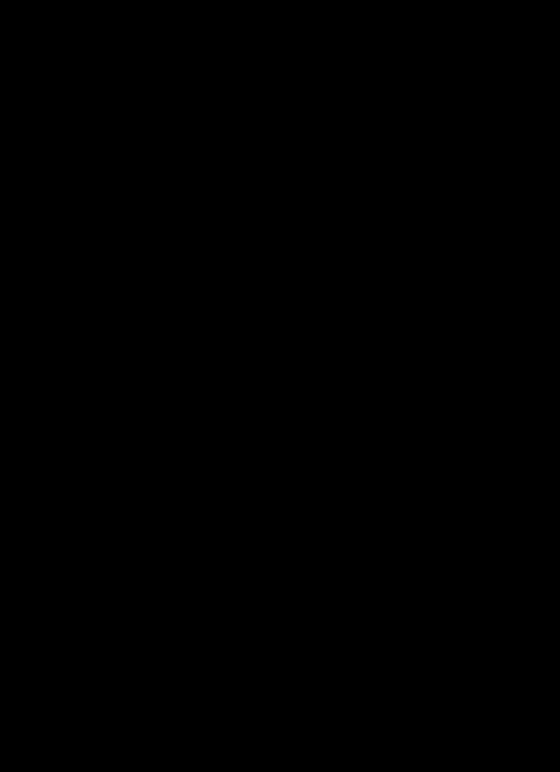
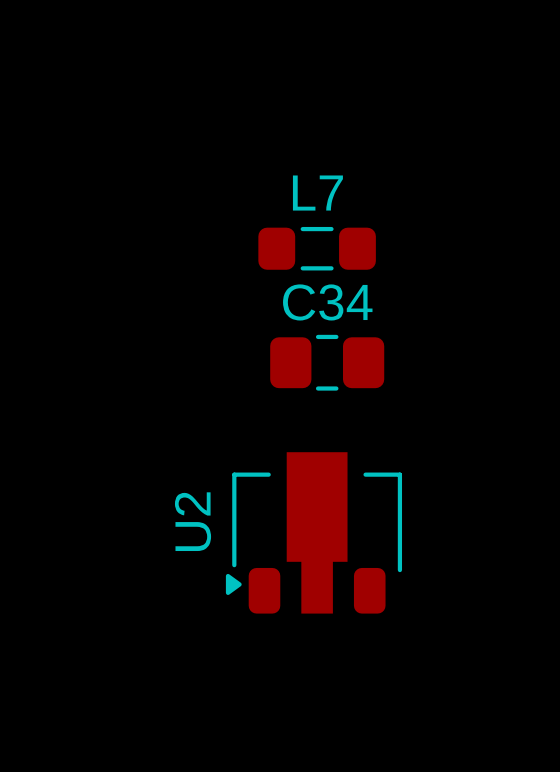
L7: none -> (317, 248)
C34: none -> (327, 362)
U2: none -> (313, 532)

